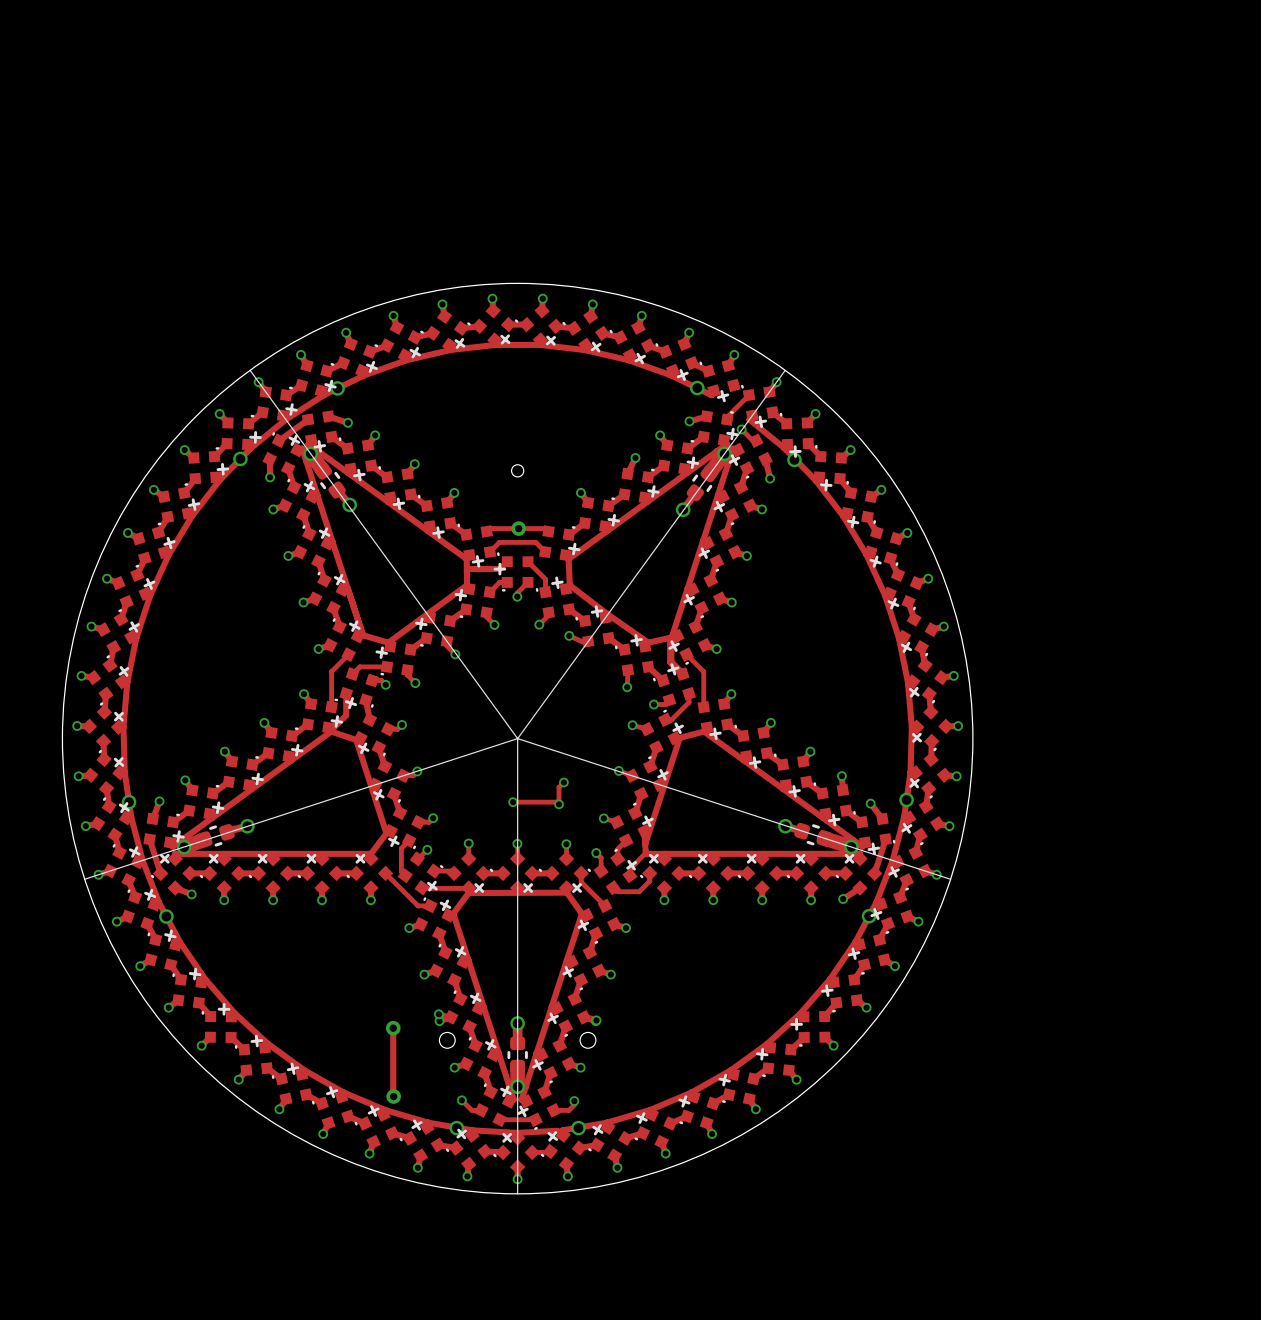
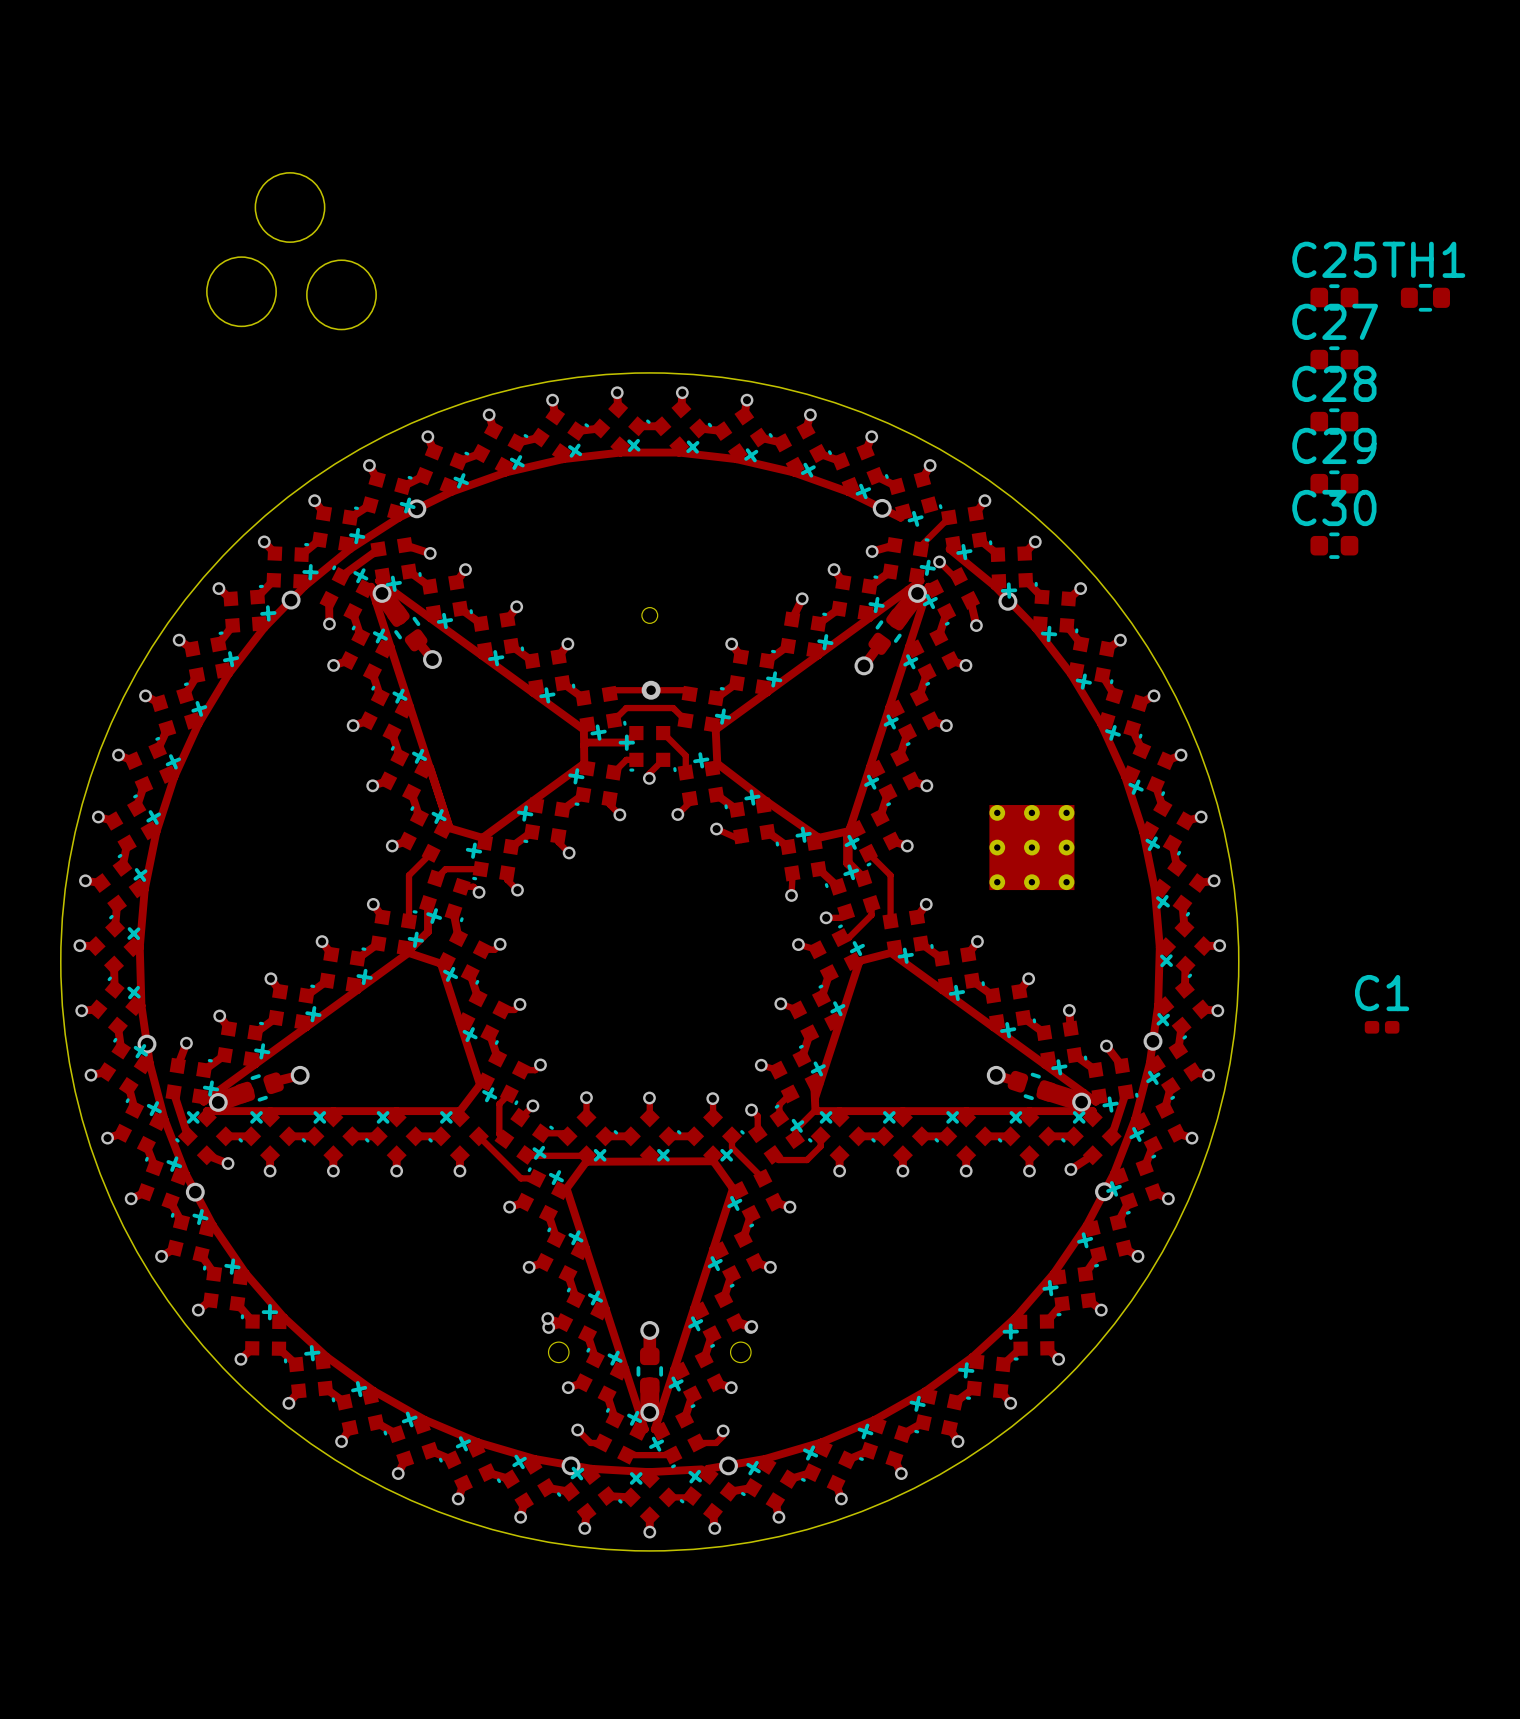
round board edge: none -> [254, 172, 326, 243]
round board edge: none -> [206, 256, 277, 328]
round board edge: none -> [306, 259, 377, 331]
C25: none -> (1334, 297)
TH1: none -> (1425, 297)
C27: none -> (1334, 359)
C28: none -> (1334, 421)
C29: none -> (1334, 483)
line: (250, 370) (517, 738) -> none
line: (785, 370) (517, 738) -> none
C30: none -> (1334, 545)
part: none -> (1031, 847)
line: (517, 738) (517, 1193) -> none
line: (517, 738) (84, 879) -> none
line: (517, 738) (950, 879) -> none
track: (563, 782) (559, 787) (559, 804) (556, 802) (513, 802) -> none
via: (563, 782) -> none
C1: none -> (1382, 1027)
via: (513, 802) -> none
via: (559, 804) -> none
track: (393, 1028) (393, 1096) -> none
via: (393, 1028) -> none
via: (393, 1096) -> none

